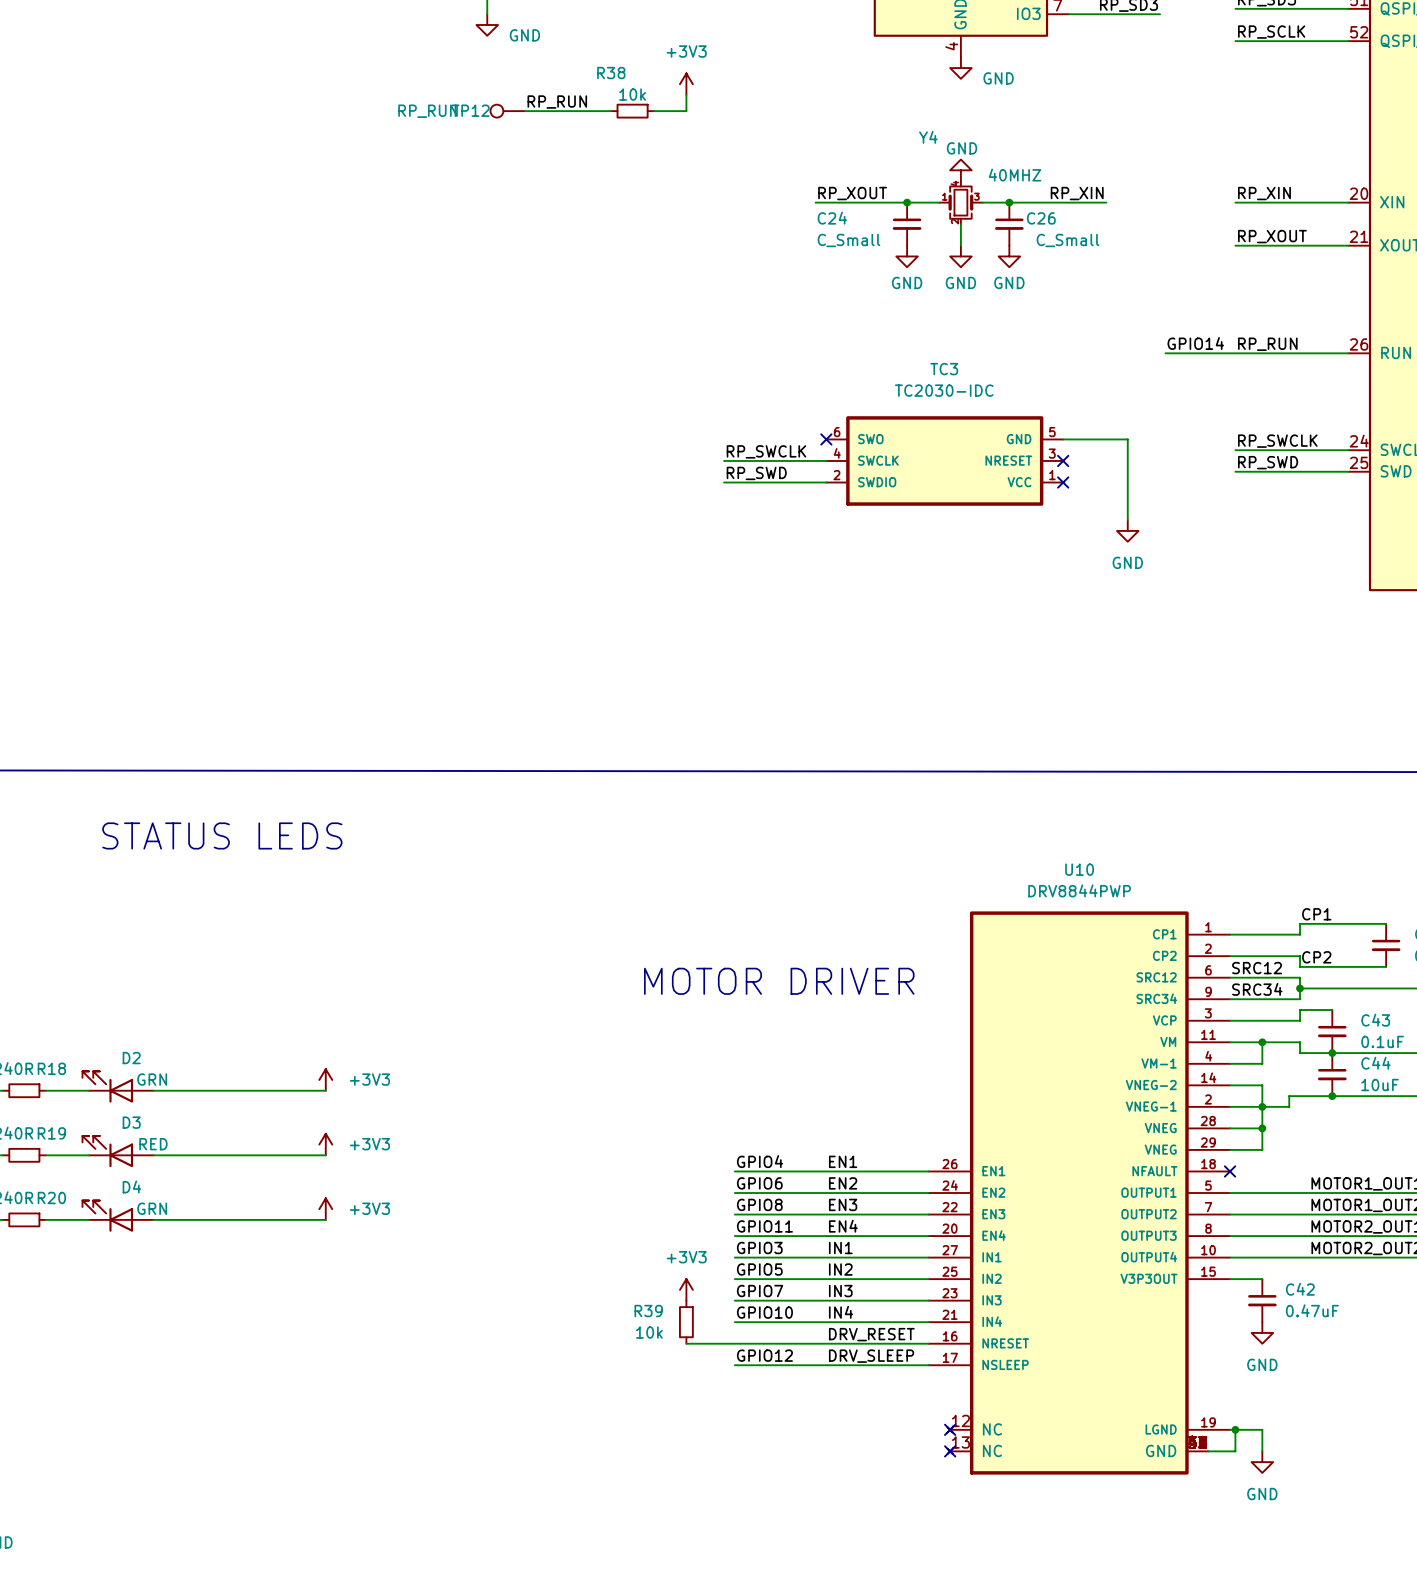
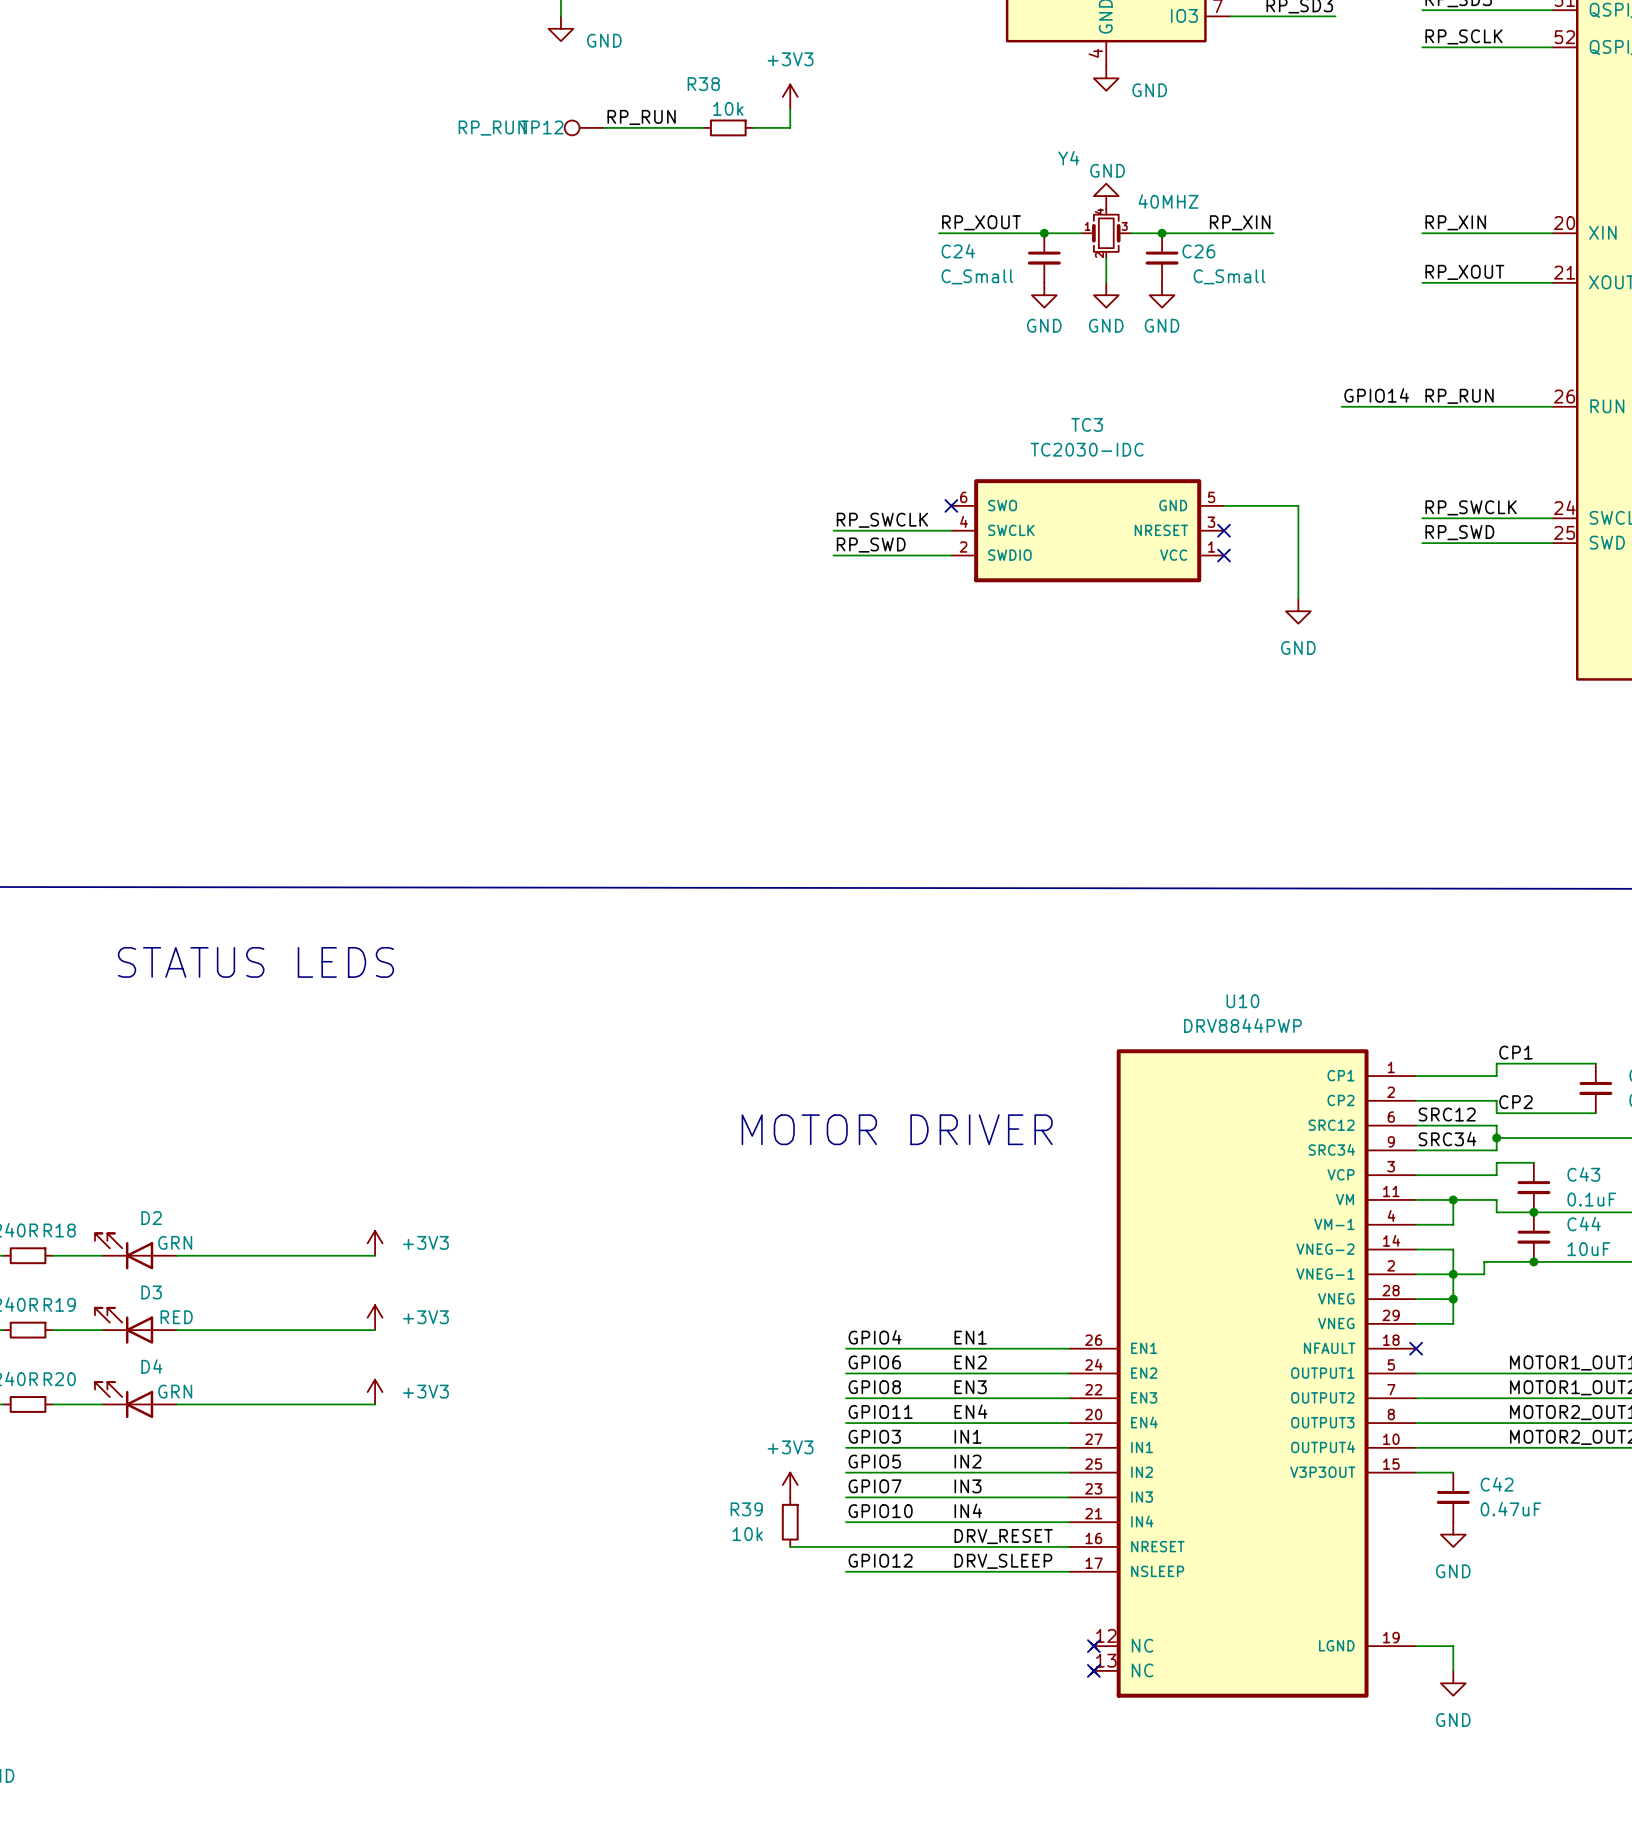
U10 symbol: [928, 911, 1231, 1475] -> [1069, 1049, 1417, 1698]
wire: (1235, 1429) (1235, 1451) (1208, 1451) -> none
junction: (1235, 1429) -> none

